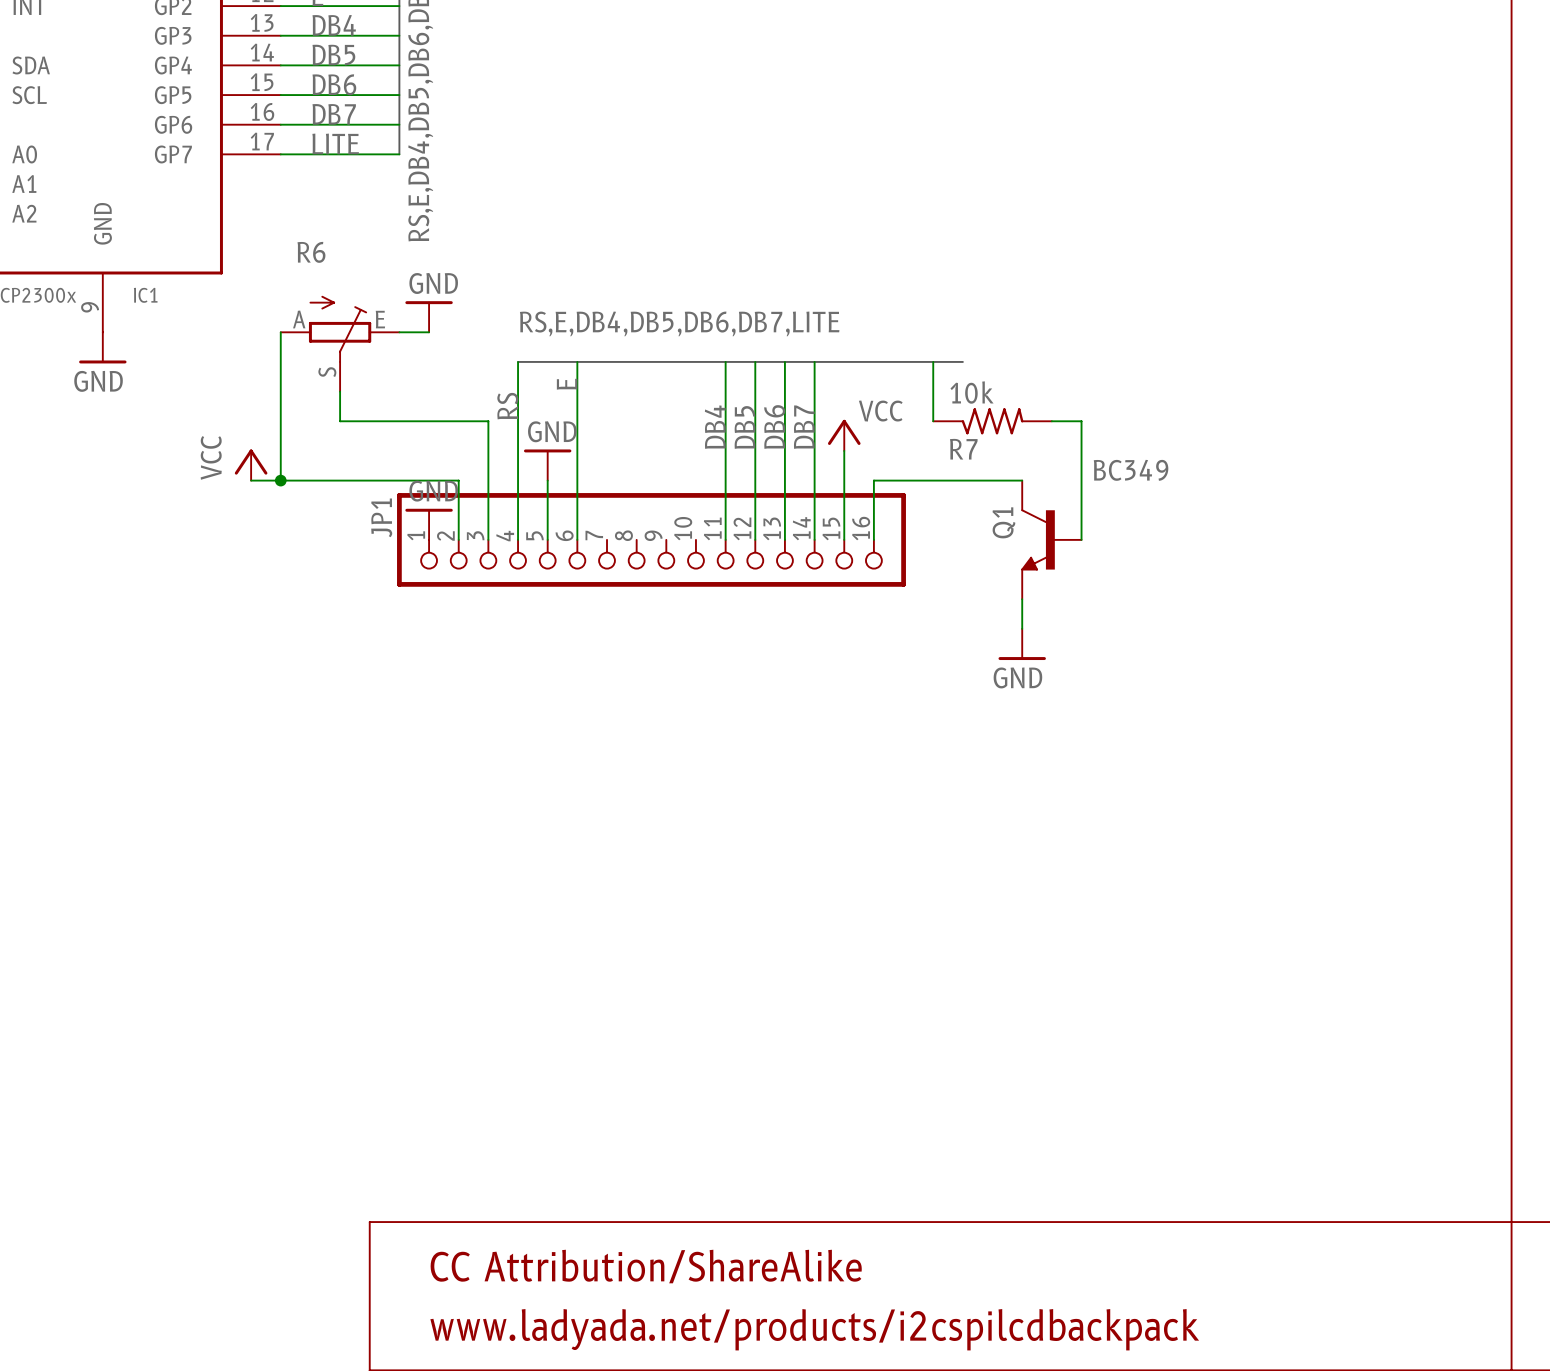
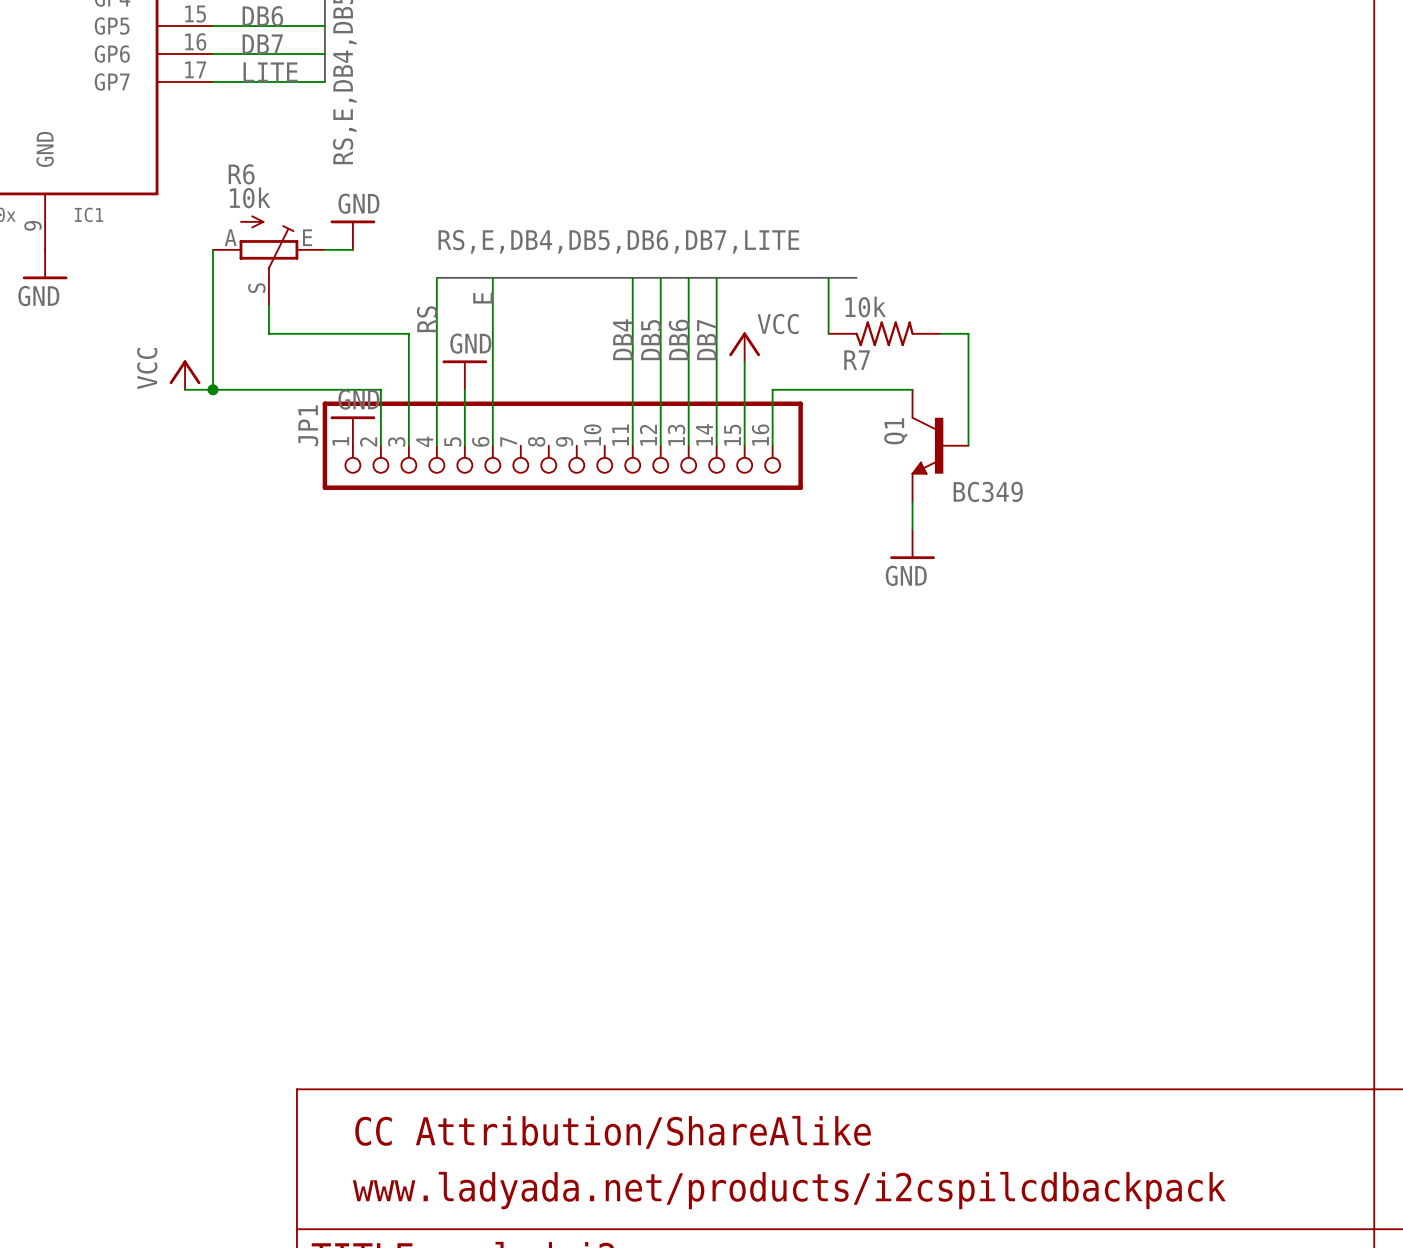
R6 value: none -> 10k (250, 197)
Q1 value position: BC349 (1131, 470) -> BC349 (988, 491)

